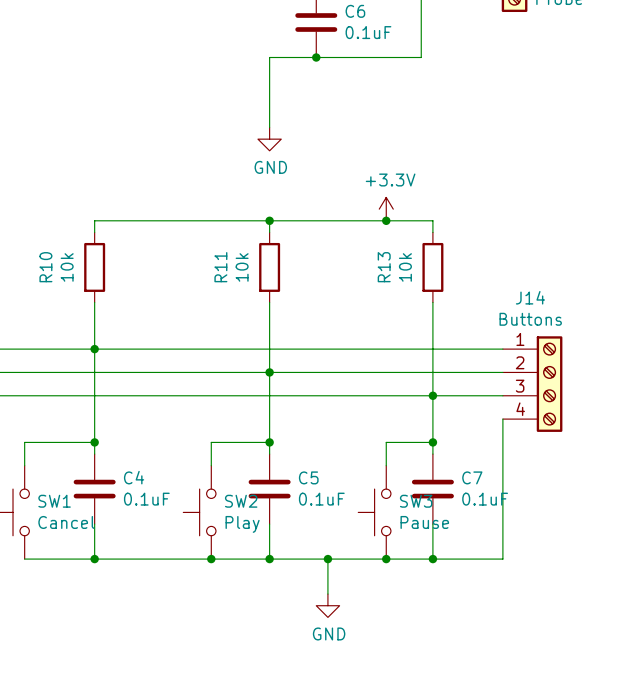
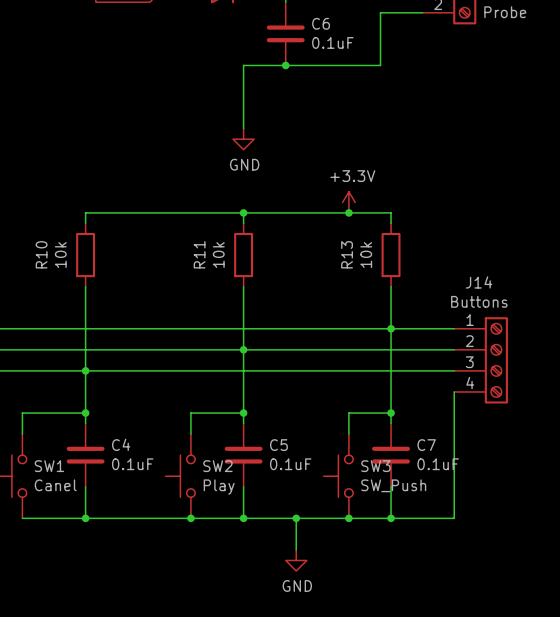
junction position: (94, 349) -> (85, 370)
junction position: (432, 395) -> (391, 328)
SW1 value: Cancel (66, 522) -> Canel (55, 485)
SW3 value: Pause (424, 522) -> SW_Push (393, 485)

